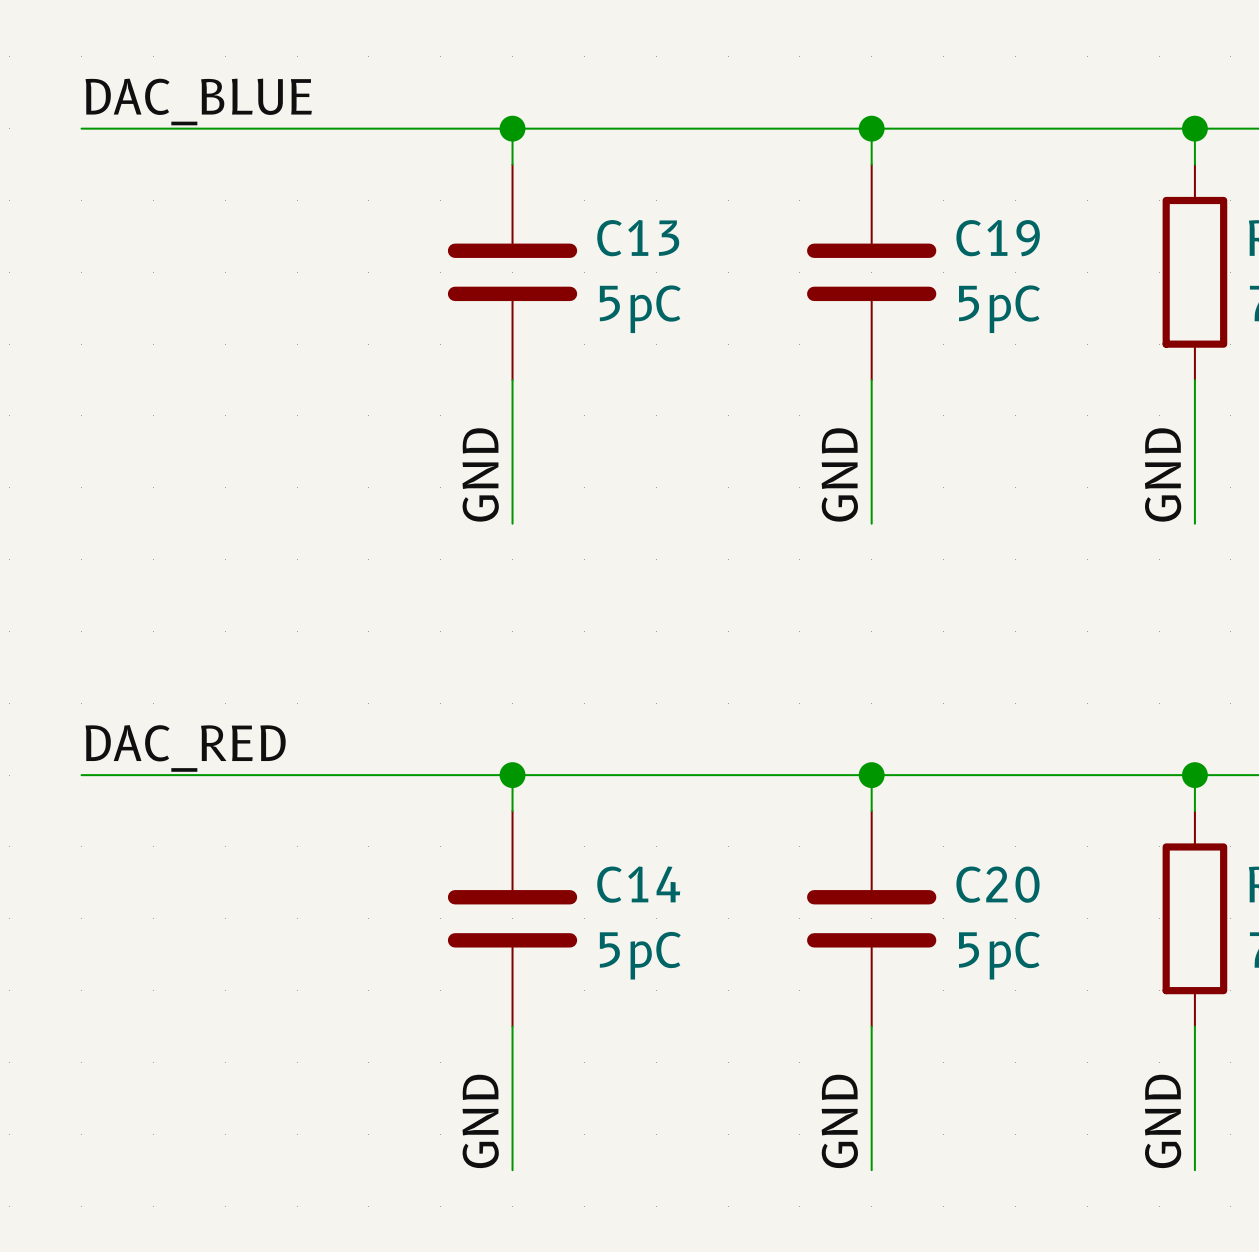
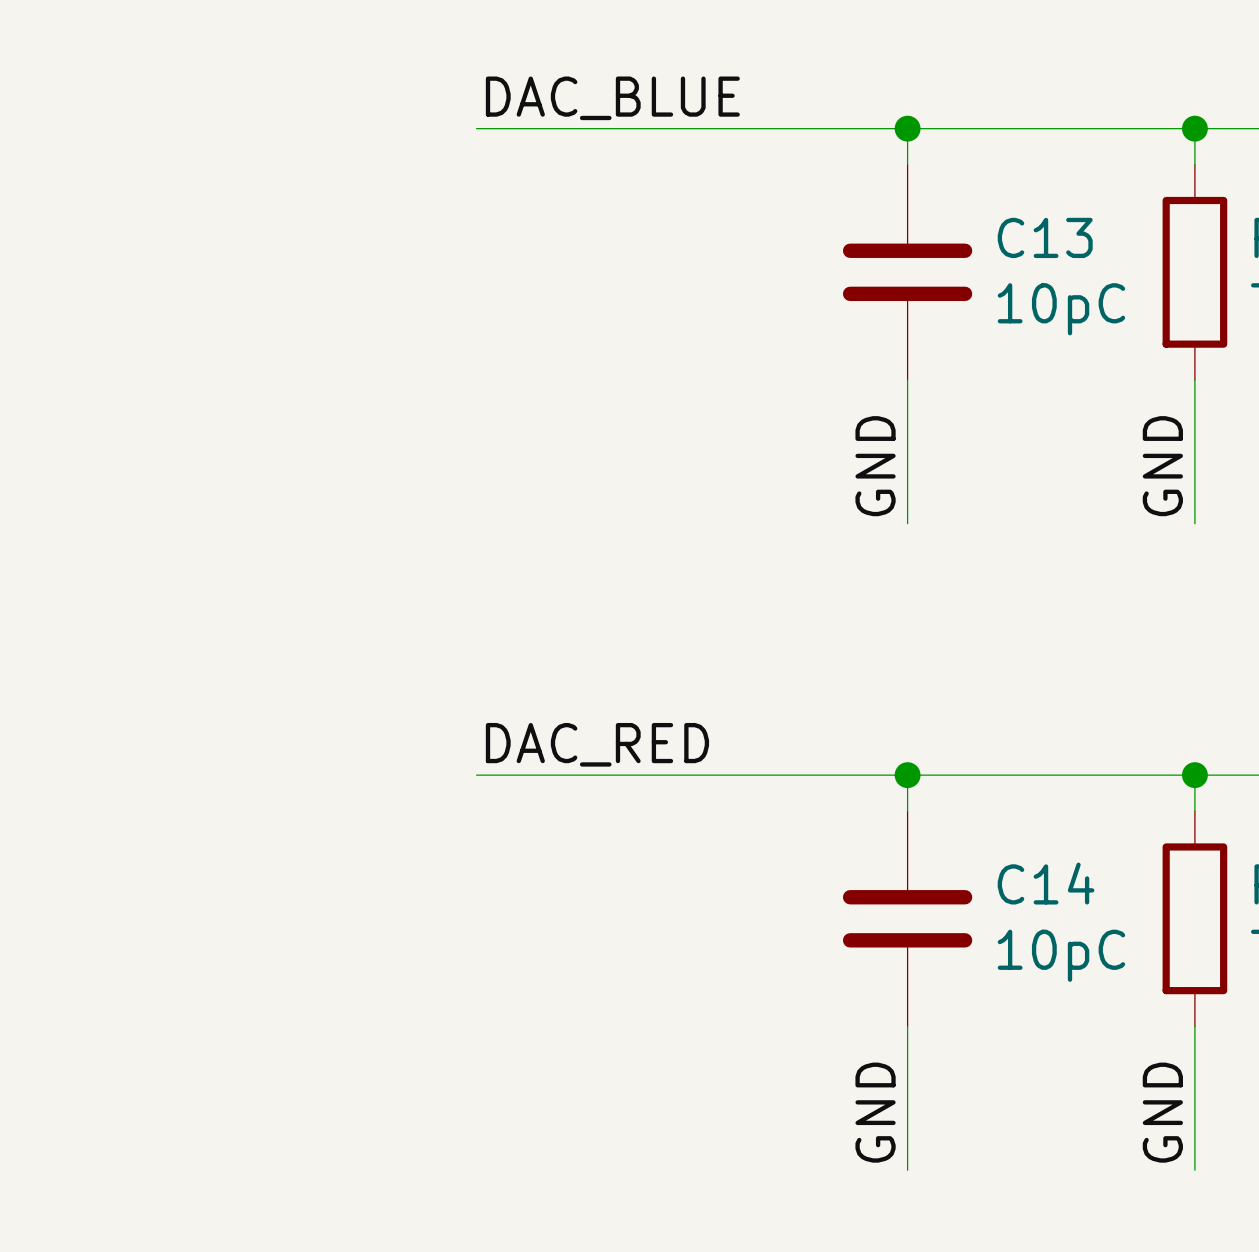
label position: DAC_BLUE (198, 101) -> DAC_BLUE (612, 98)
wire: (81, 128) (476, 128) -> none
wire: (512, 128) (512, 164) -> none
junction: (512, 128) -> none
wire: (871, 128) (871, 164) -> (907, 128) (907, 164)
junction position: (871, 128) -> (907, 128)
C13 position: (512, 272) -> (907, 272)
C19: 5pC (871, 272) -> none
C13 value: 5pC (640, 309) -> 10pC (1061, 309)
wire: (512, 380) (512, 523) -> none
wire: (871, 380) (871, 523) -> (907, 380) (907, 523)
label: GND (480, 474) -> none
label position: GND (839, 474) -> GND (875, 466)
label position: DAC_RED (185, 748) -> DAC_RED (597, 744)
wire: (81, 775) (476, 775) -> none
wire: (512, 775) (512, 811) -> none
junction: (512, 775) -> none
wire: (871, 775) (871, 811) -> (907, 775) (907, 811)
junction position: (871, 775) -> (907, 775)
C14 position: (512, 918) -> (907, 918)
C20: 5pC (871, 918) -> none
C14 value: 5pC (640, 955) -> 10pC (1061, 955)
wire: (512, 1026) (512, 1170) -> none
wire: (871, 1026) (871, 1170) -> (907, 1026) (907, 1170)
label: GND (480, 1121) -> none
label position: GND (839, 1121) -> GND (875, 1112)

